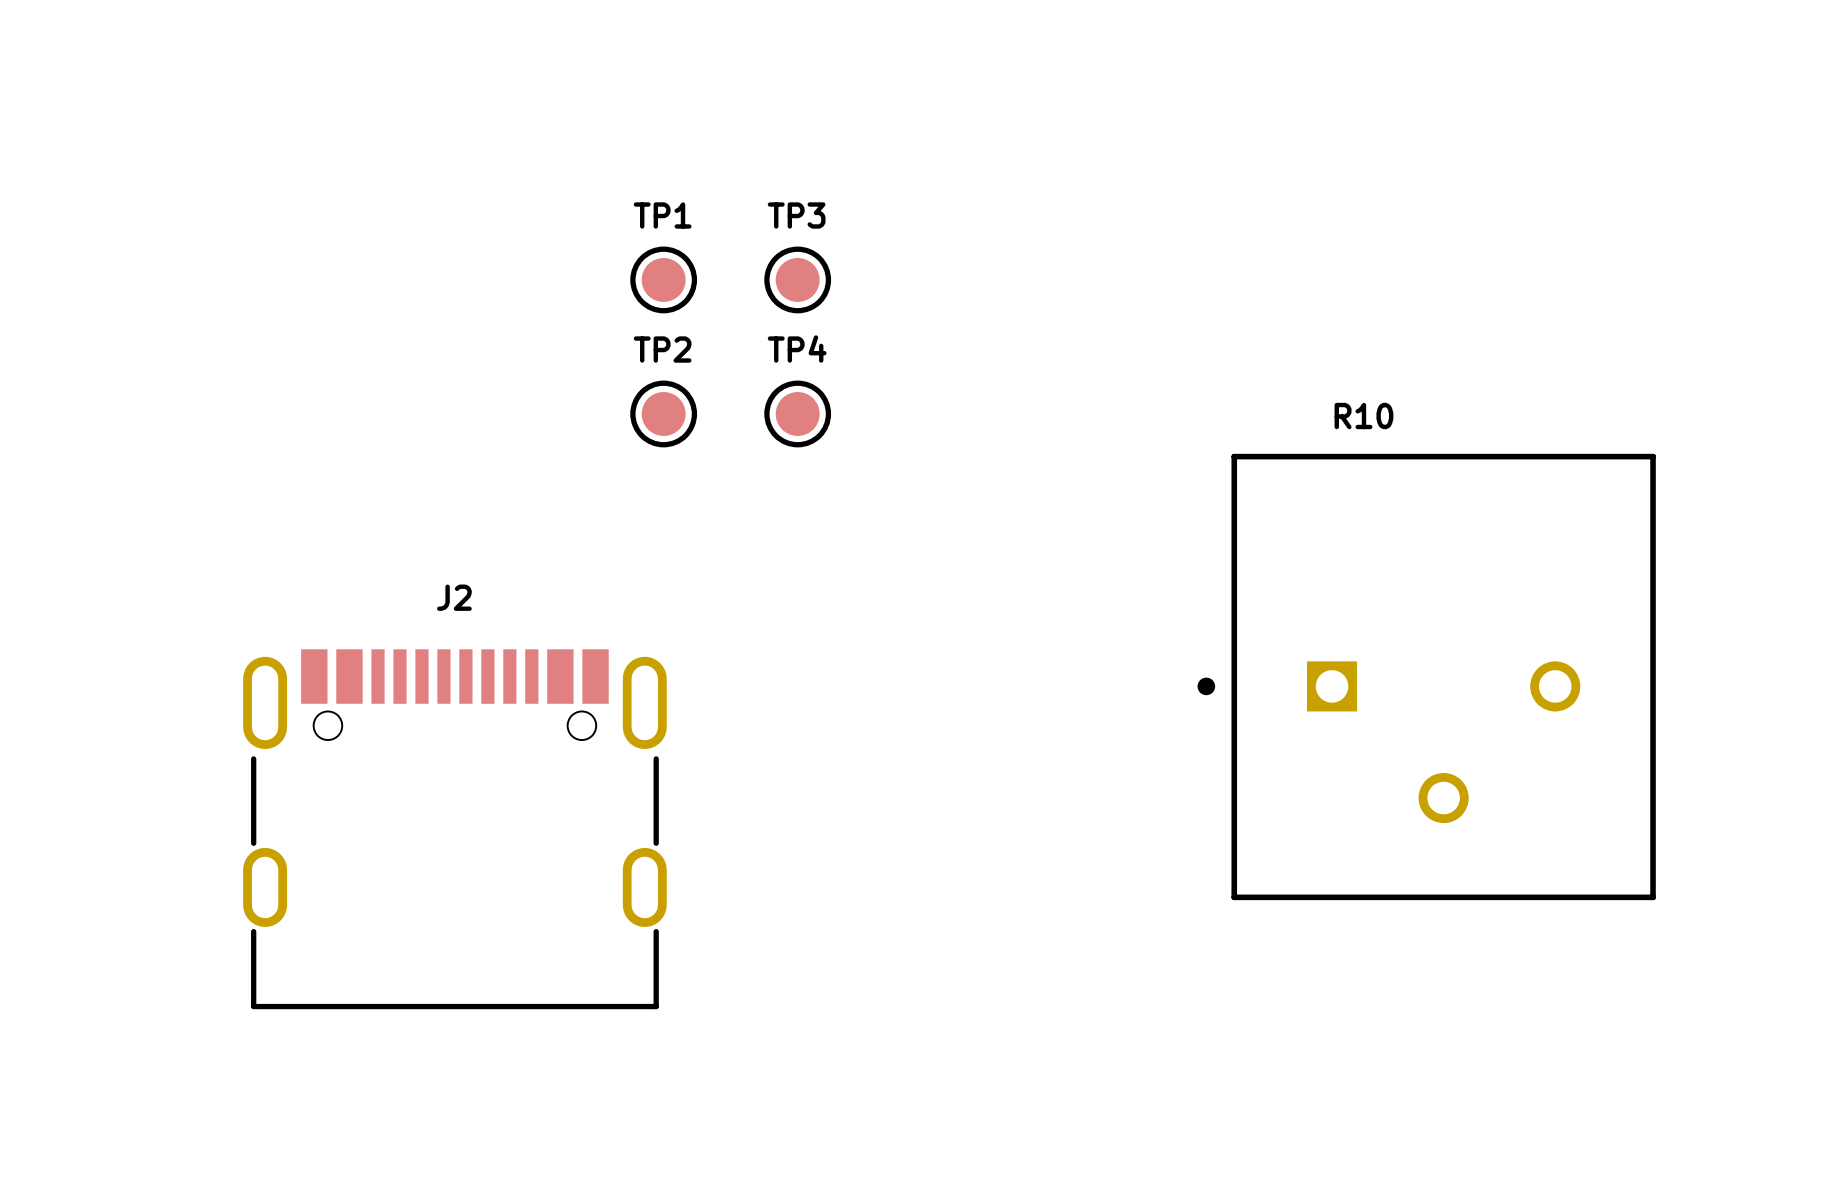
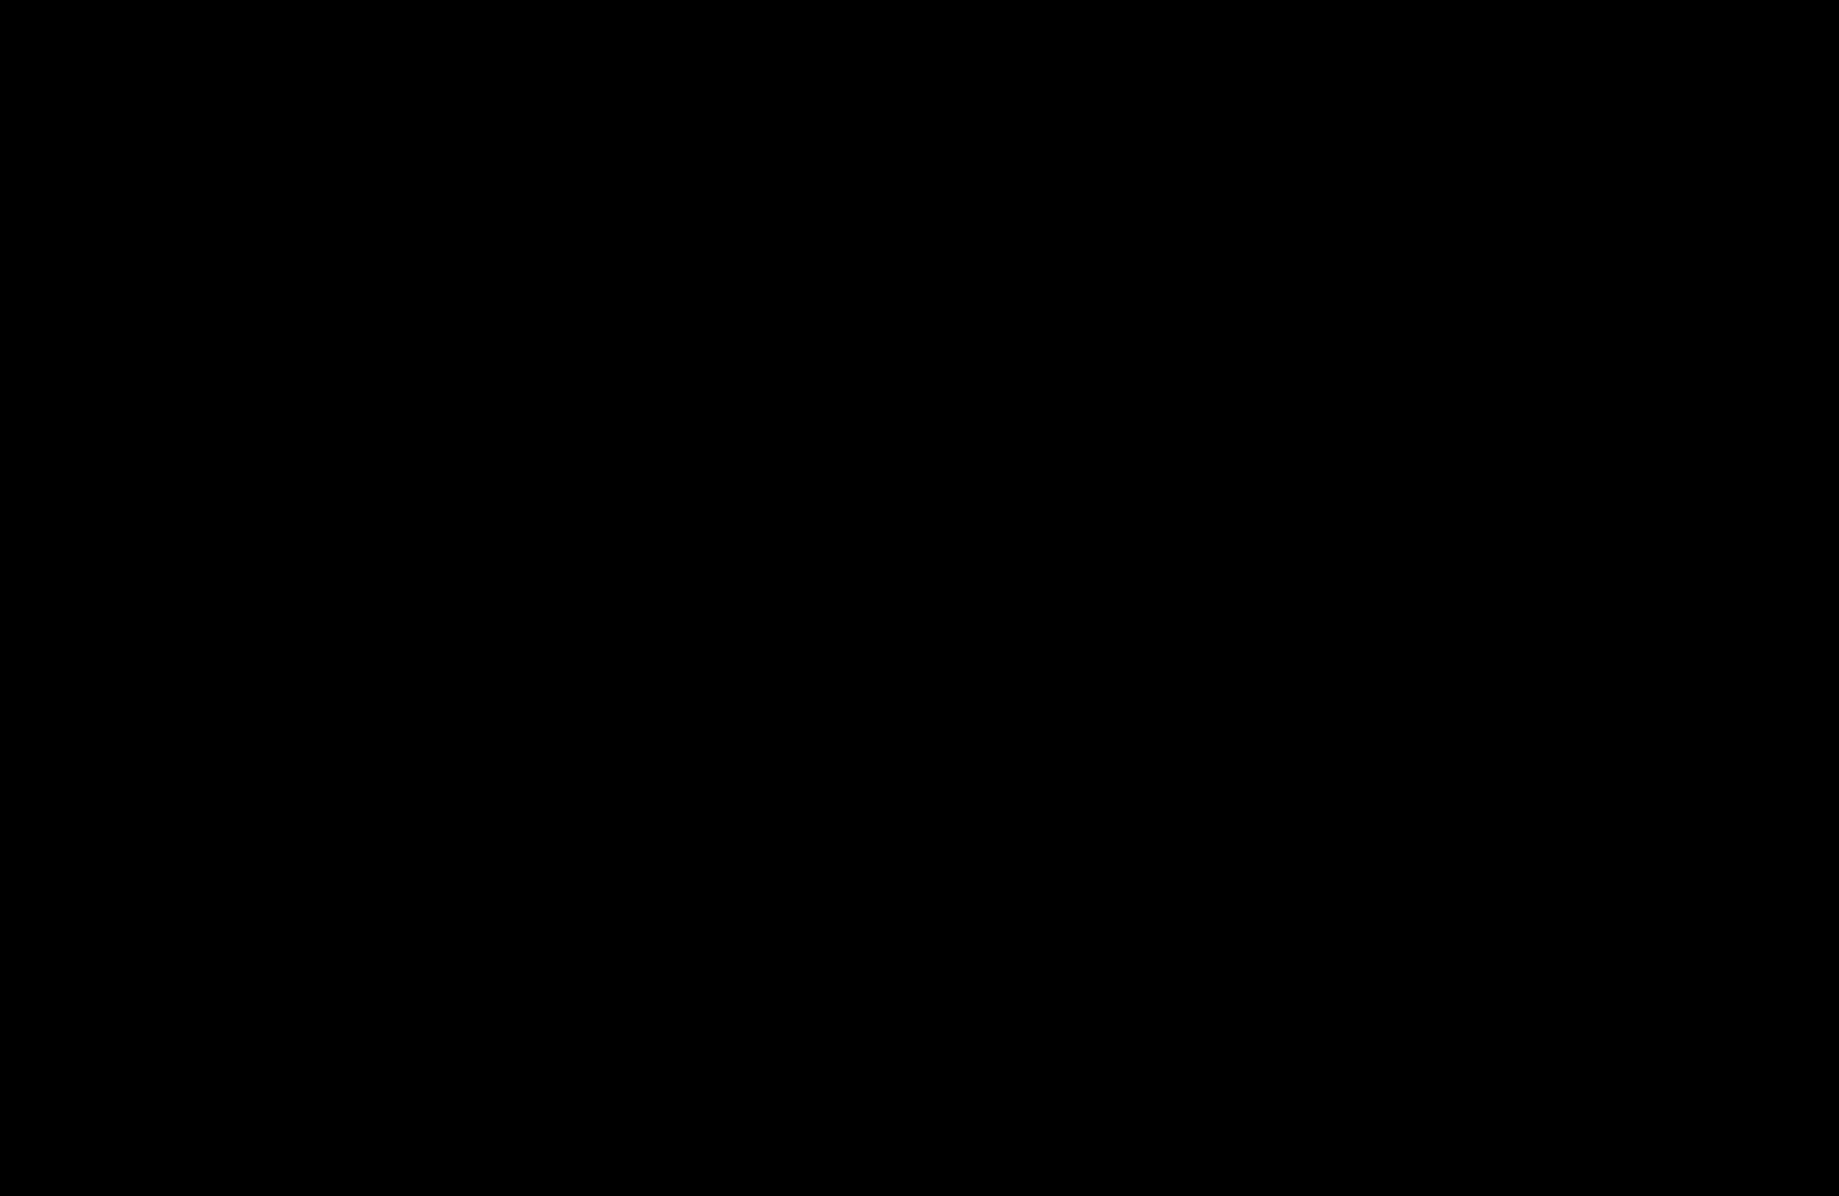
TP1: (663, 279) -> none
TP3: (797, 279) -> none
TP2: (663, 413) -> none
TP4: (797, 413) -> none
R10: (1426, 676) -> none
J2: (454, 829) -> none

